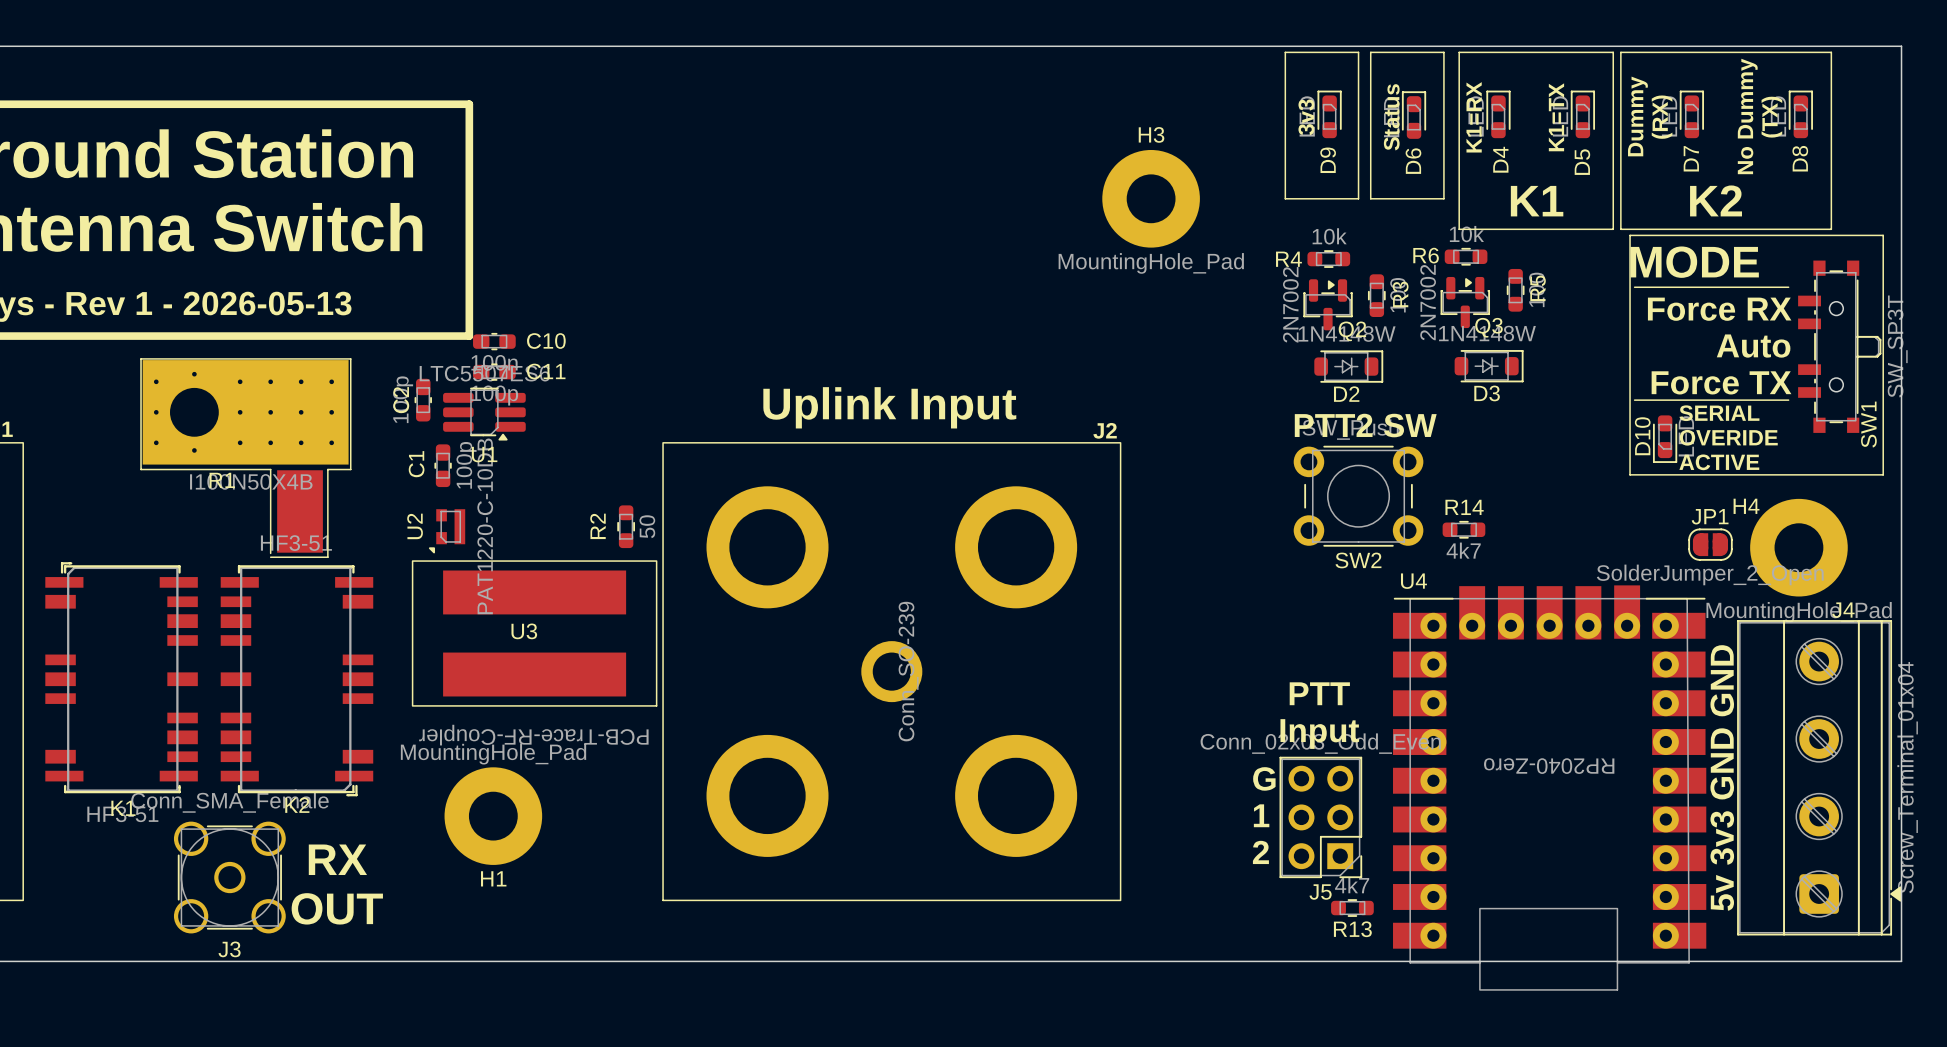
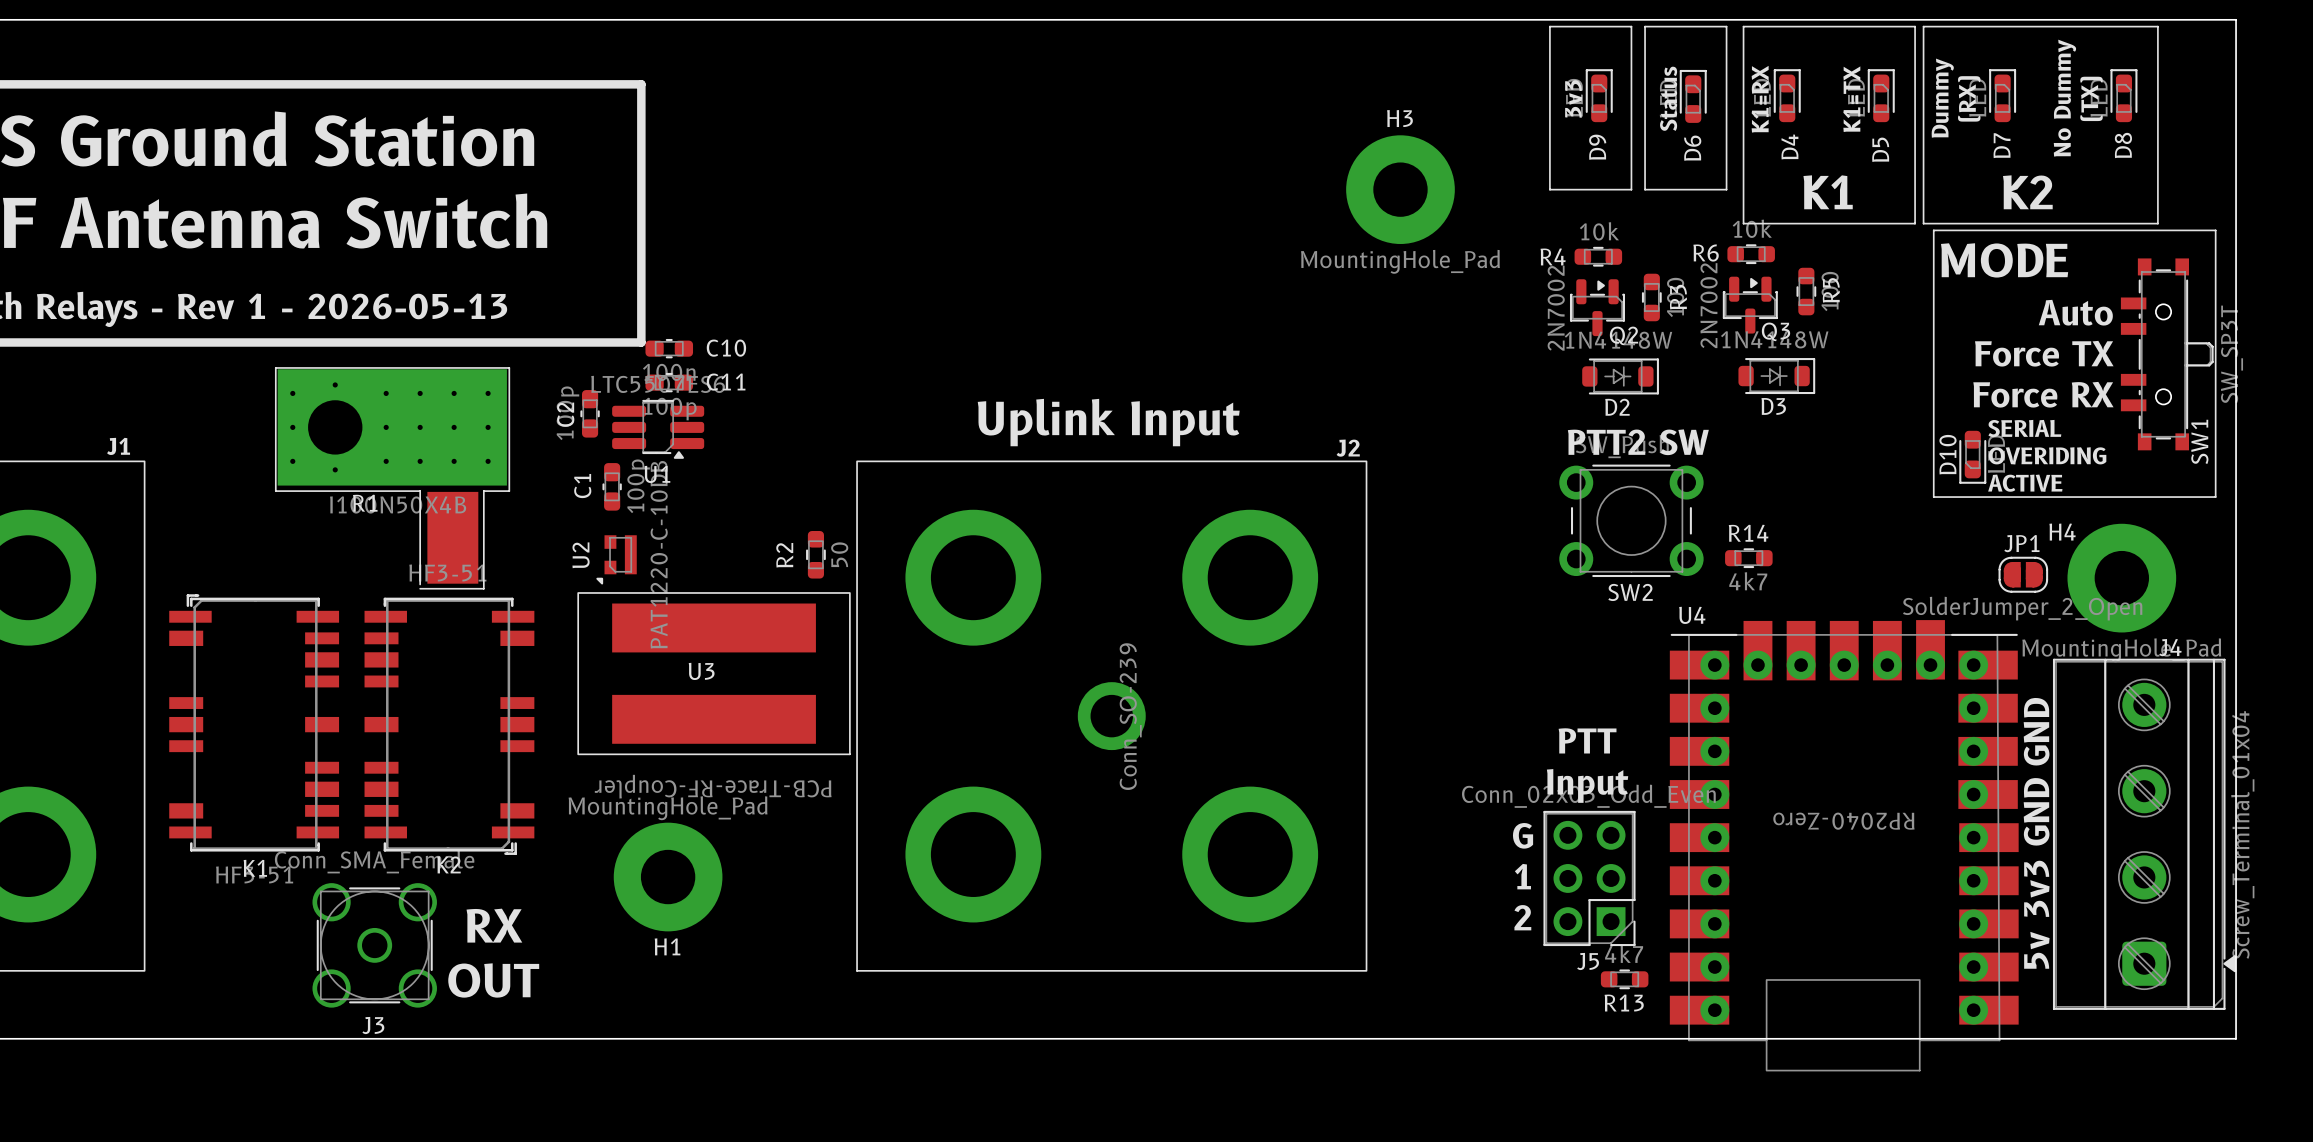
line: (1634, 287) (1788, 287) -> none
text position: Force RX (1719, 309) -> Force RX (2043, 394)
text position: Auto (1753, 346) -> Auto (2075, 312)
text position: Force TX (1721, 382) -> Force TX (2044, 353)
line: (1634, 400) (1788, 400) -> none
text: OVERIDE (1728, 437) -> OVERIDING (2047, 455)

